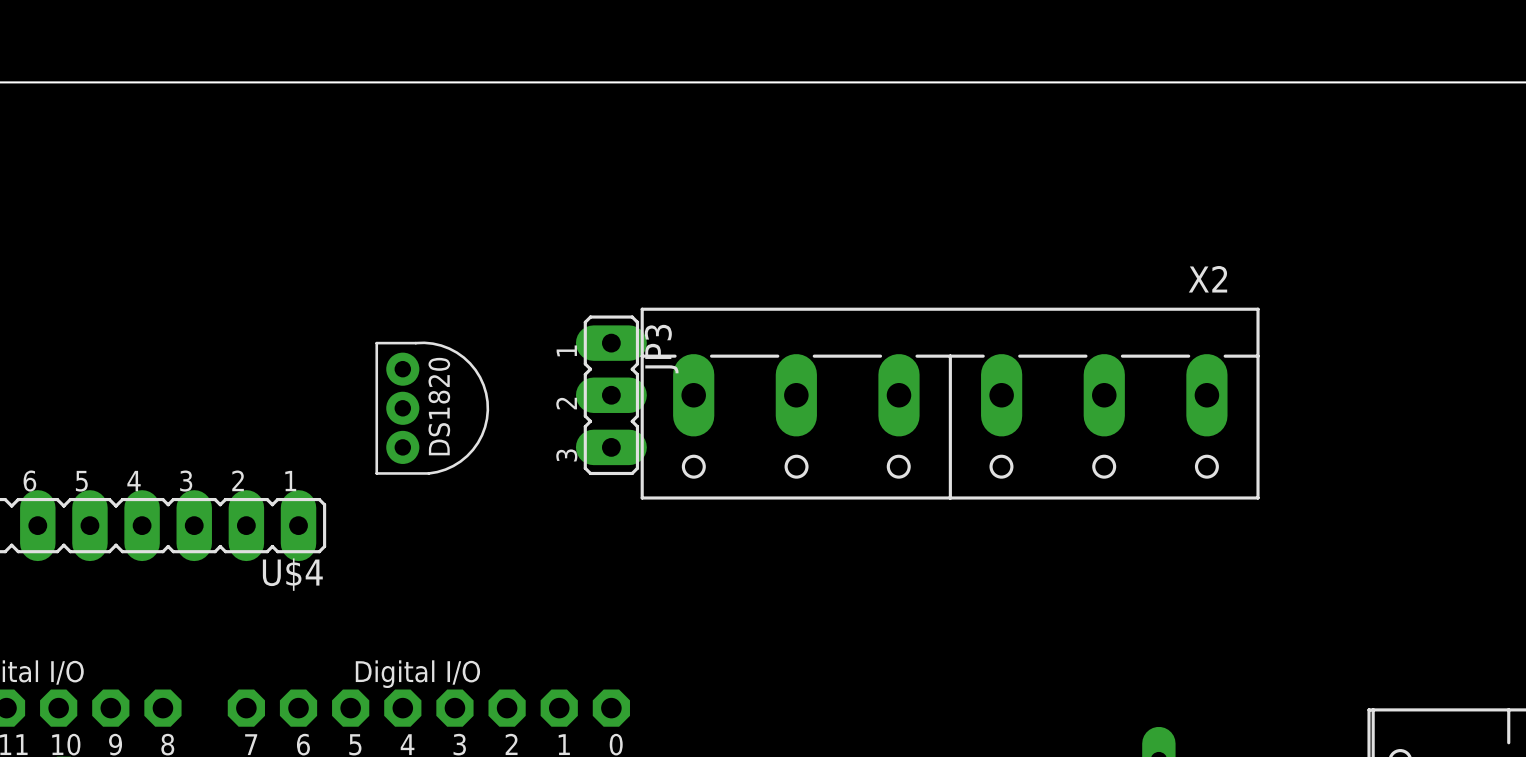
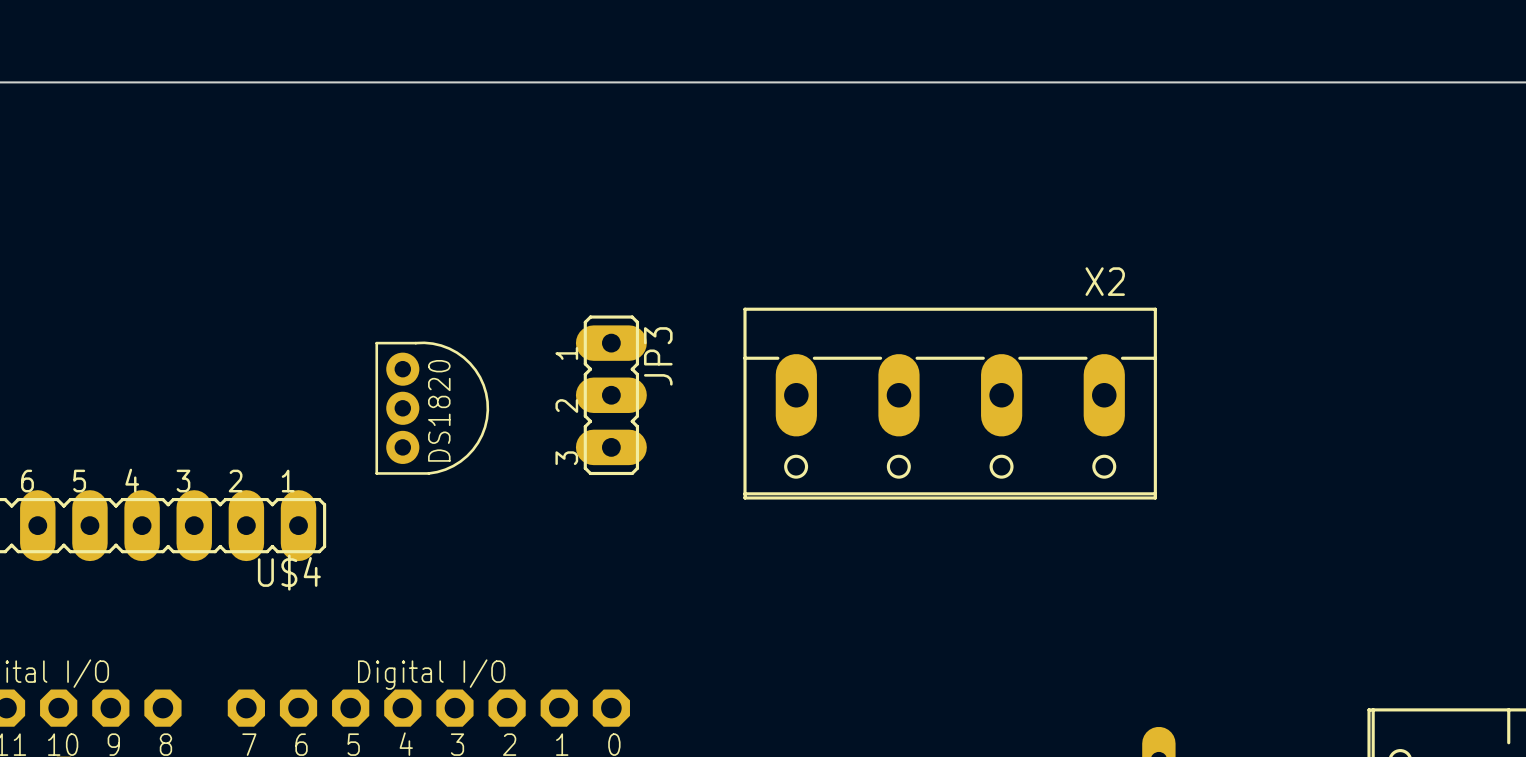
X2 name position: X2 (1207, 279) -> X2 (1105, 281)
X2 footprint: [640, 307, 1260, 500] -> [743, 307, 1157, 500]

